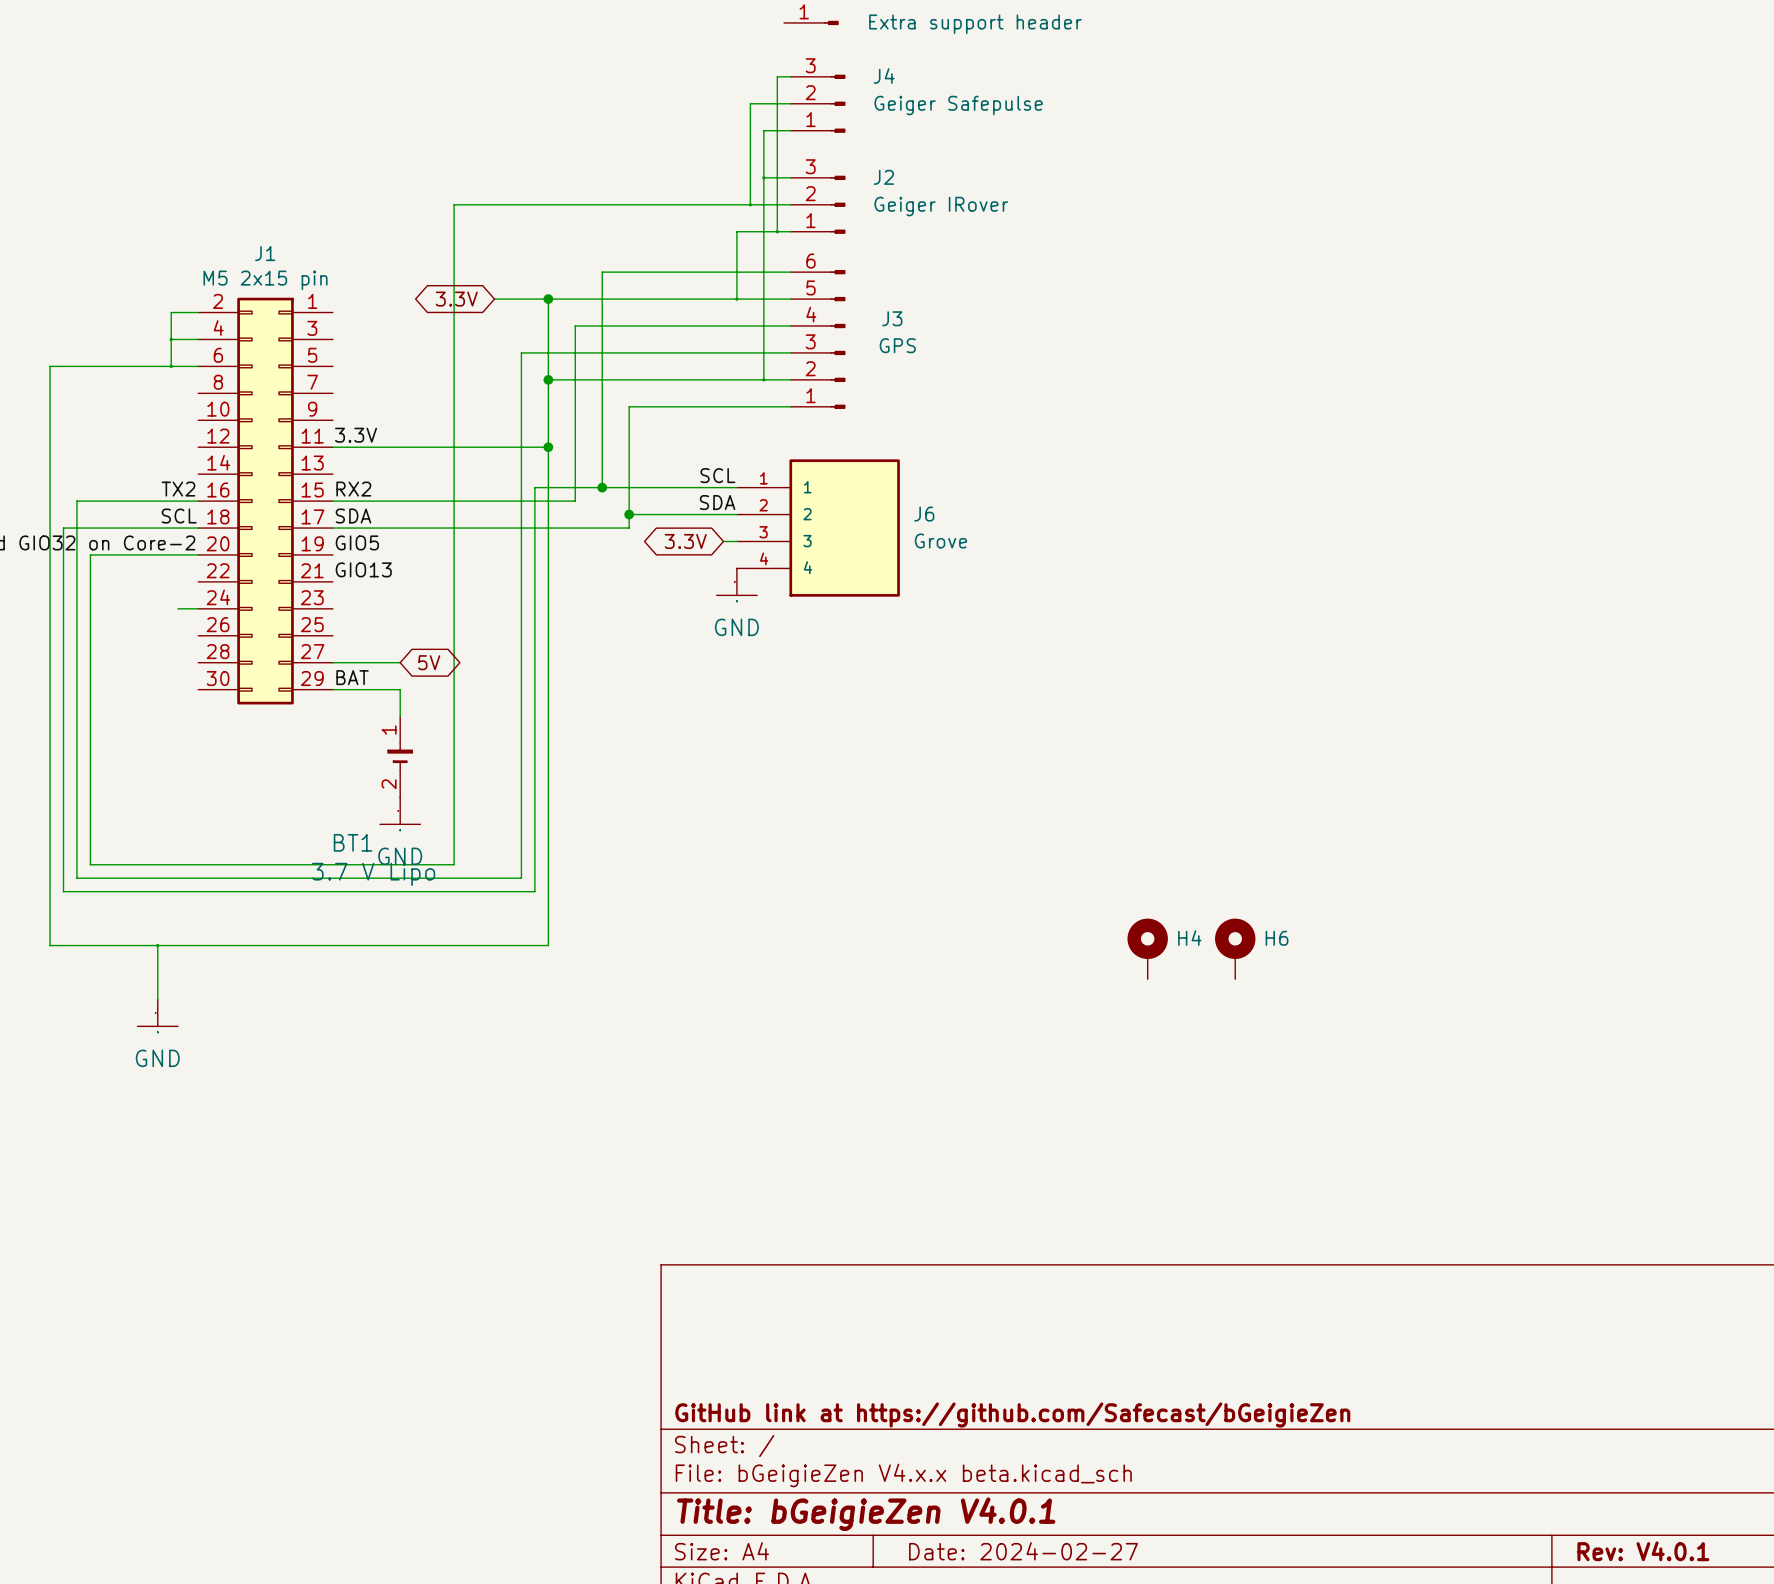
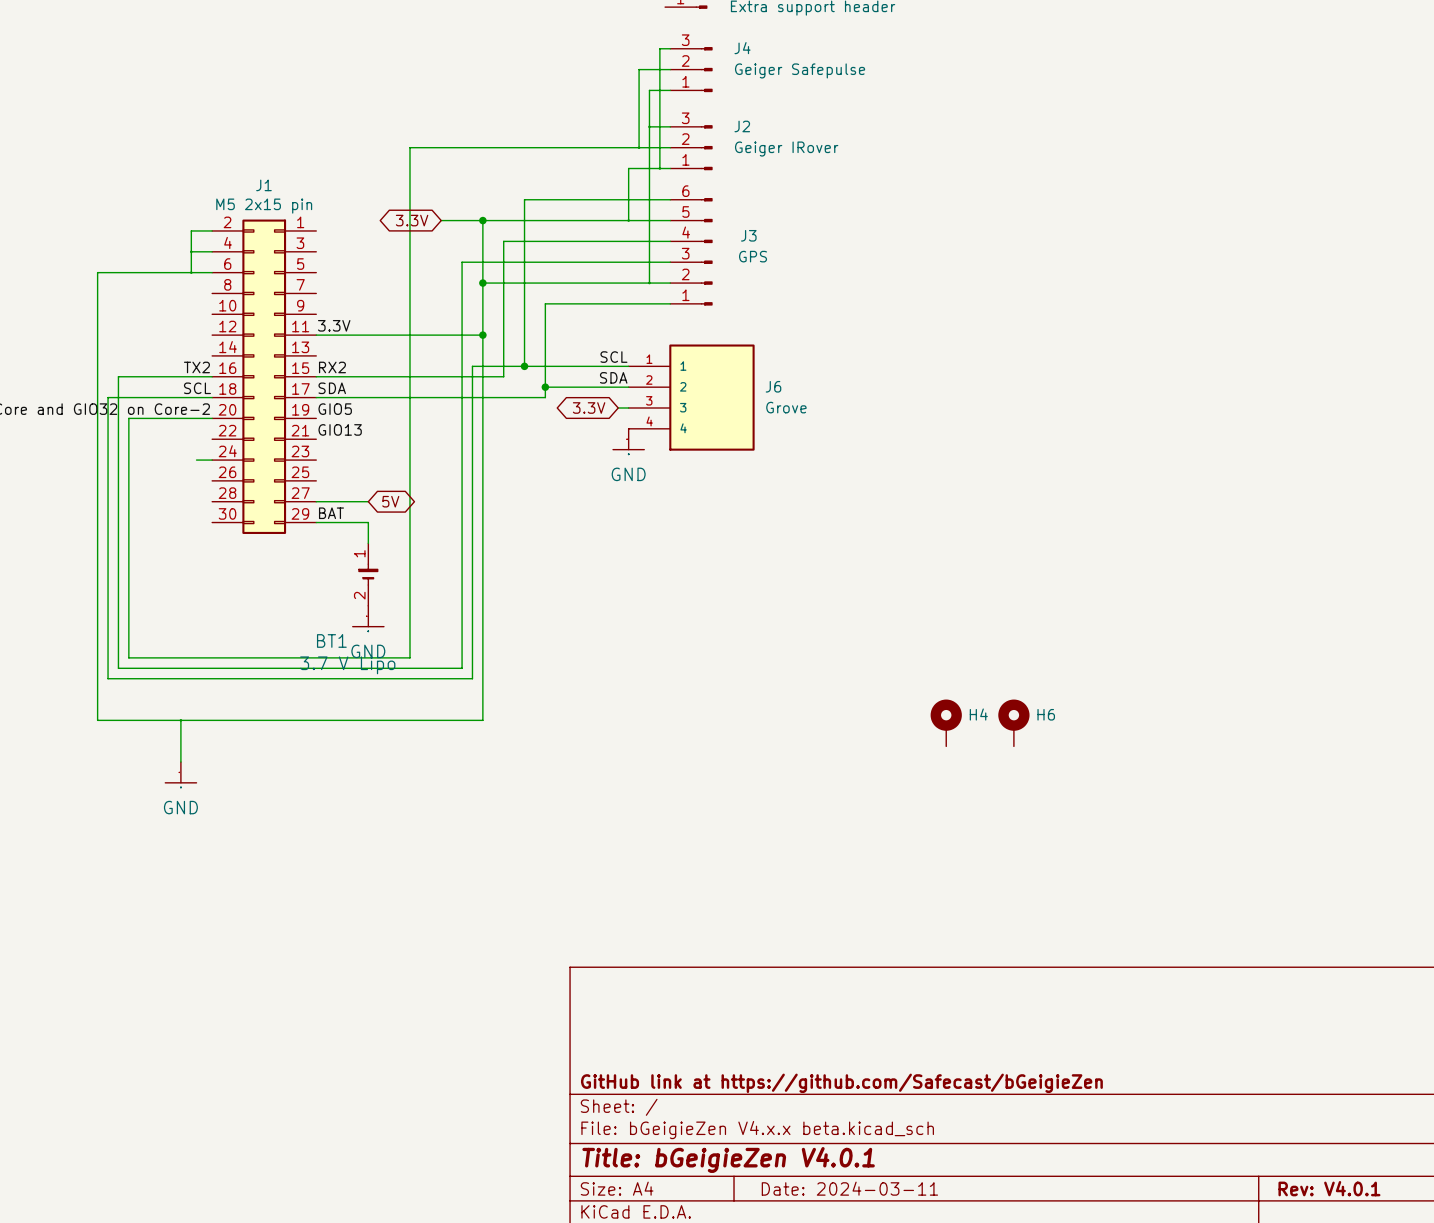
title block: Date: 2024-02-27 (1023, 1551) -> Date: 2024-03-11 (849, 1188)

